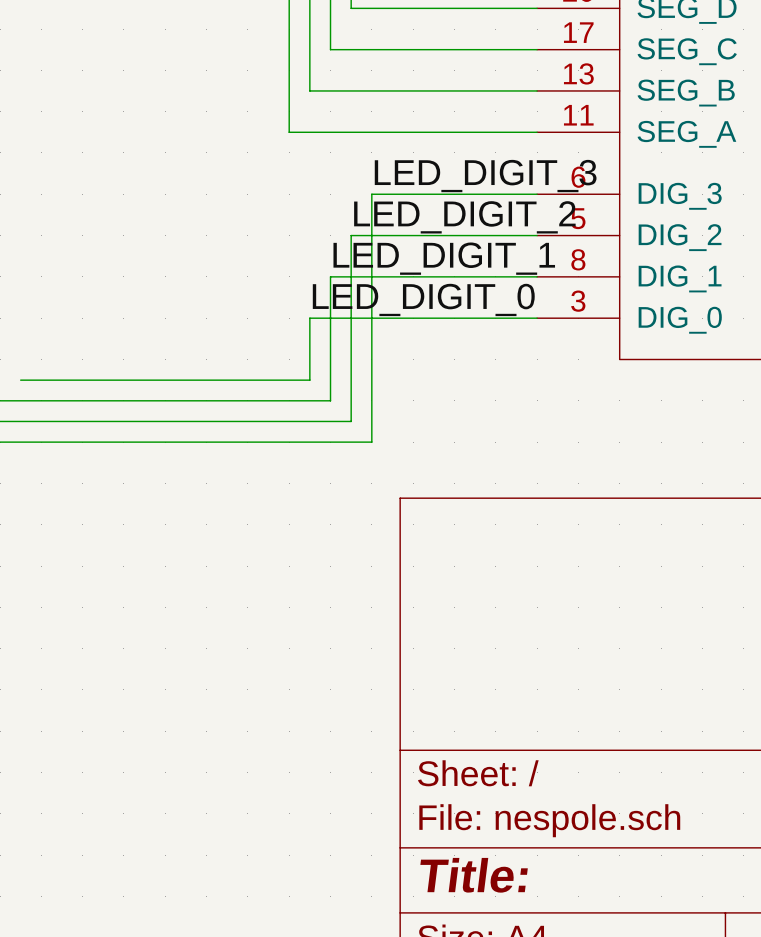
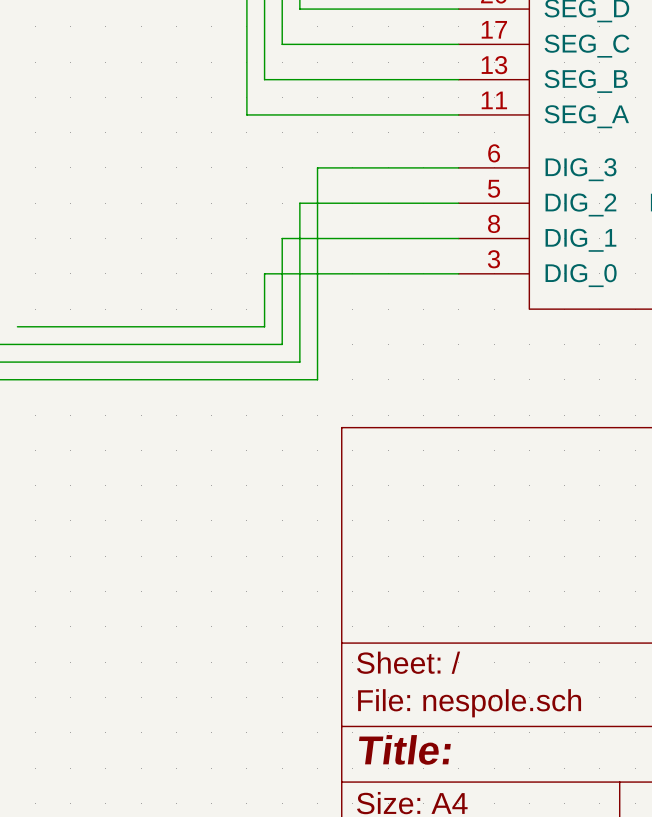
label: LED_DIGIT_3 (485, 176) -> none
label: LED_DIGIT_2 (464, 217) -> none
label: LED_DIGIT_1 (444, 258) -> none
label: LED_DIGIT_0 (423, 299) -> none

